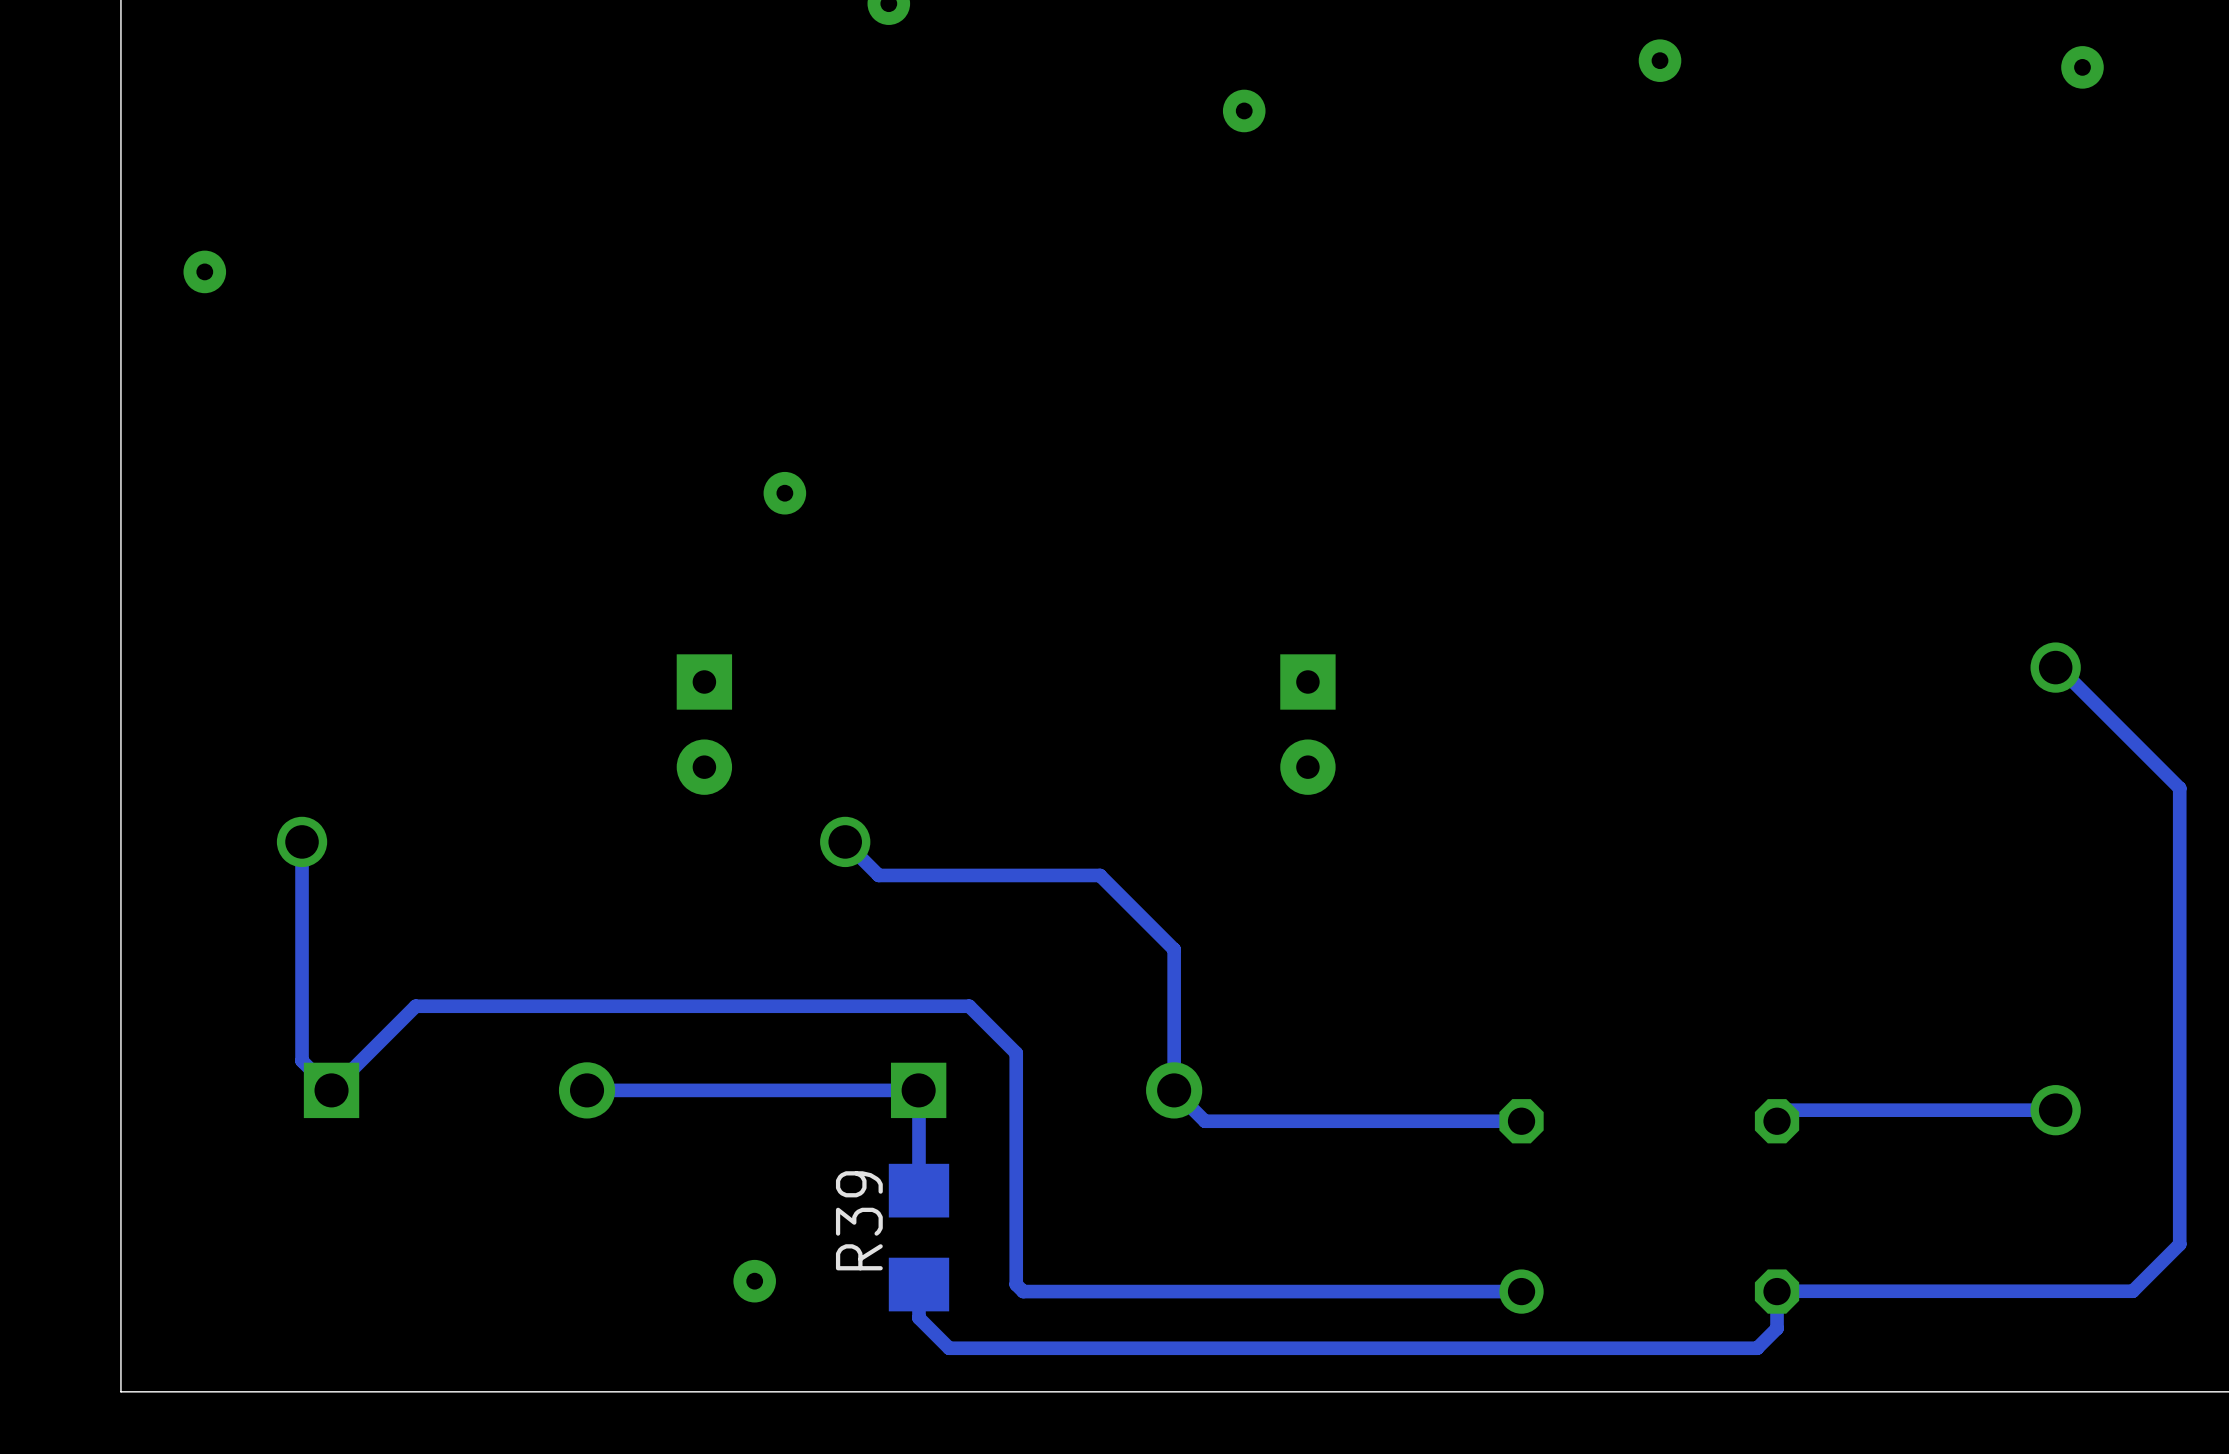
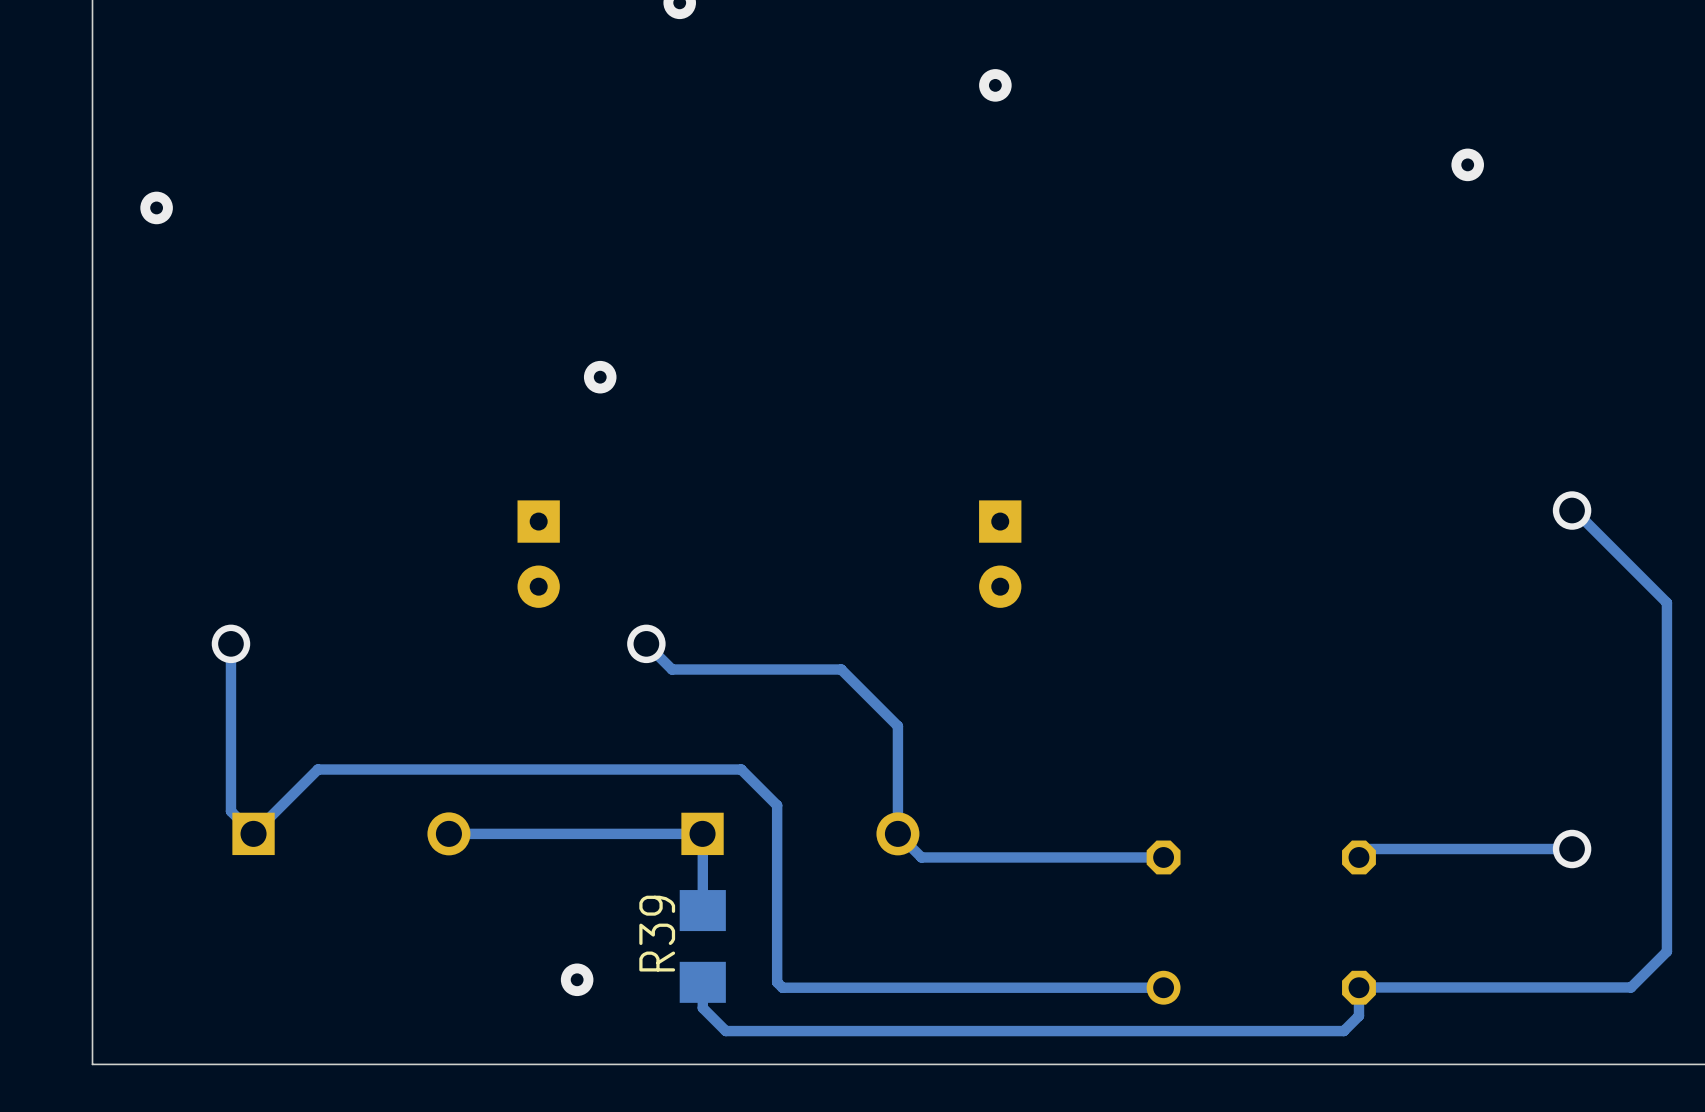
via: (1660, 60) -> none
via: (2082, 67) -> none
via position: (1244, 110) -> (995, 85)
via: none -> (1467, 164)

